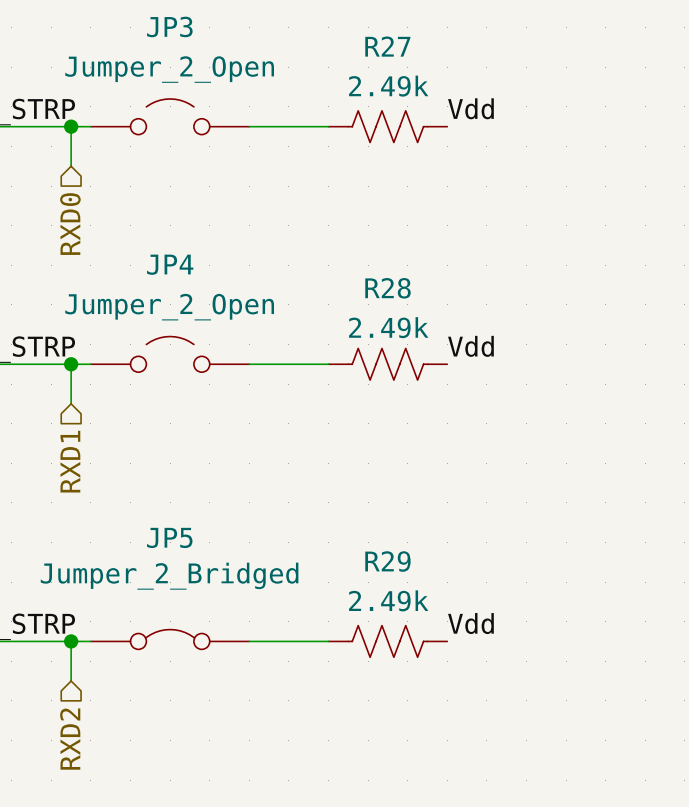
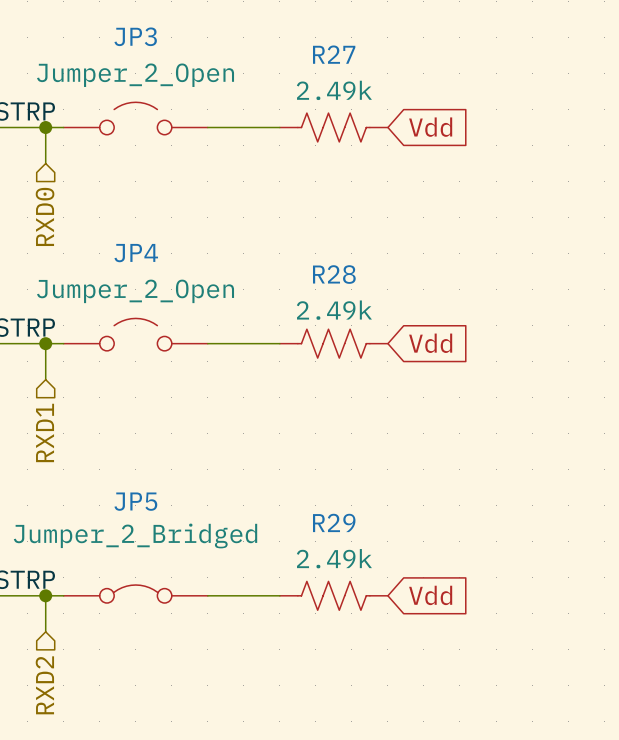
label: Vdd (470, 108) -> none
global label: none -> Vdd (430, 127)
label: Vdd (470, 346) -> none
global label: none -> Vdd (430, 343)
label: Vdd (470, 623) -> none
global label: none -> Vdd (430, 595)

